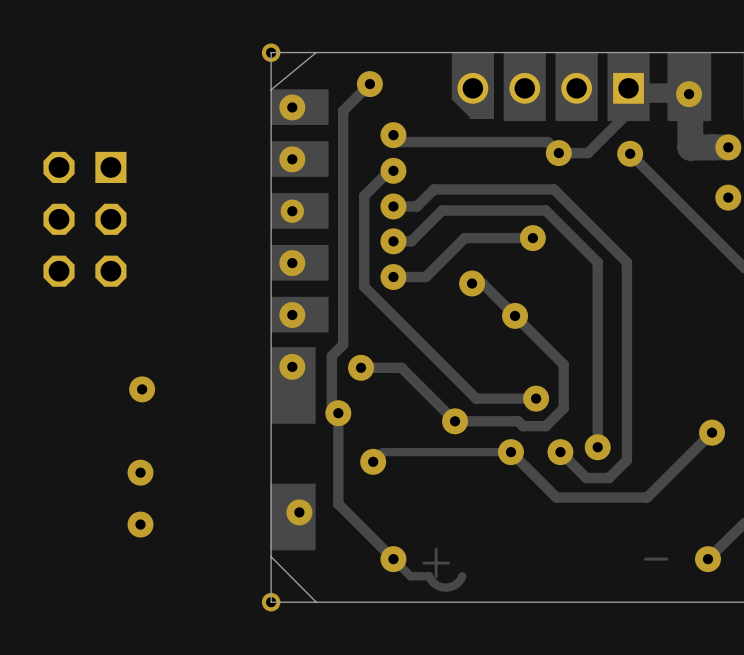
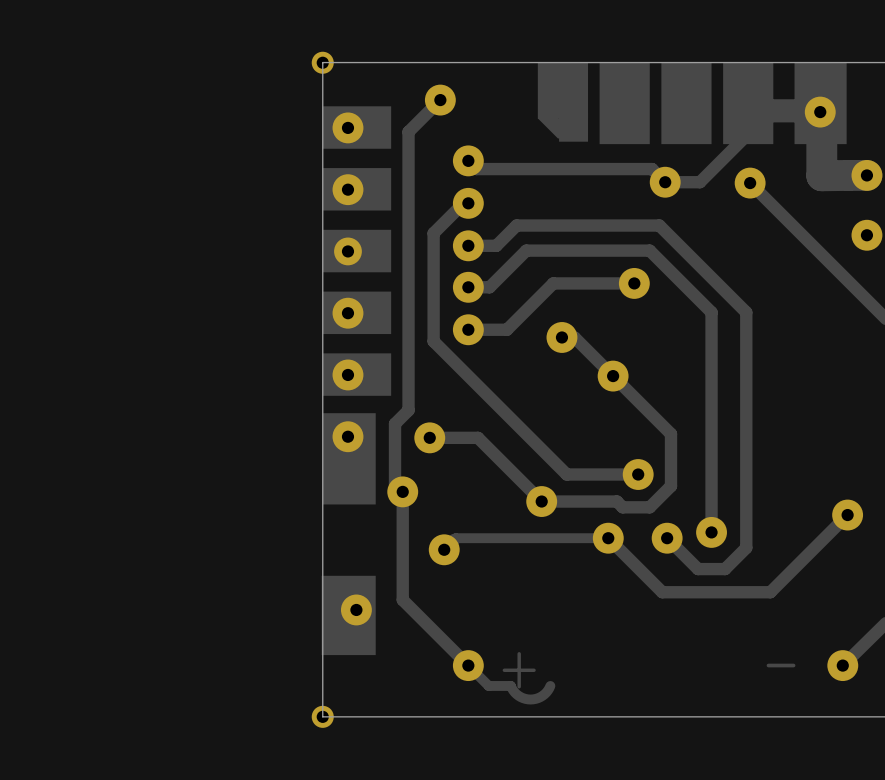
board edge: (316, 52) (271, 89) -> none
part: (550, 88) -> none
part: (84, 219) -> none
via: (142, 389) -> none
via: (140, 472) -> none
via: (140, 524) -> none
board edge: (271, 556) (316, 602) -> none

